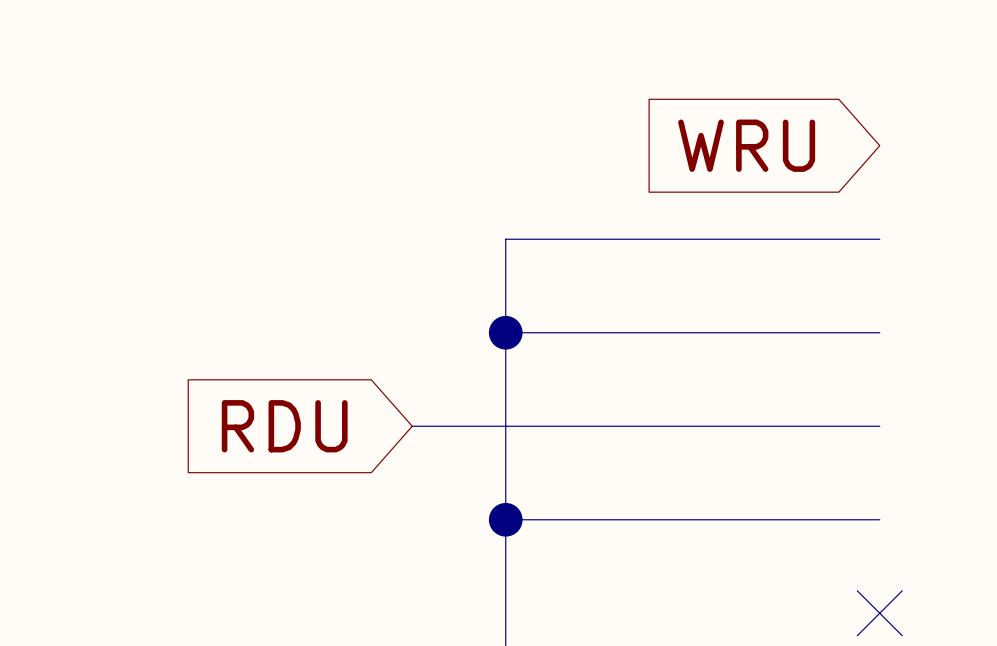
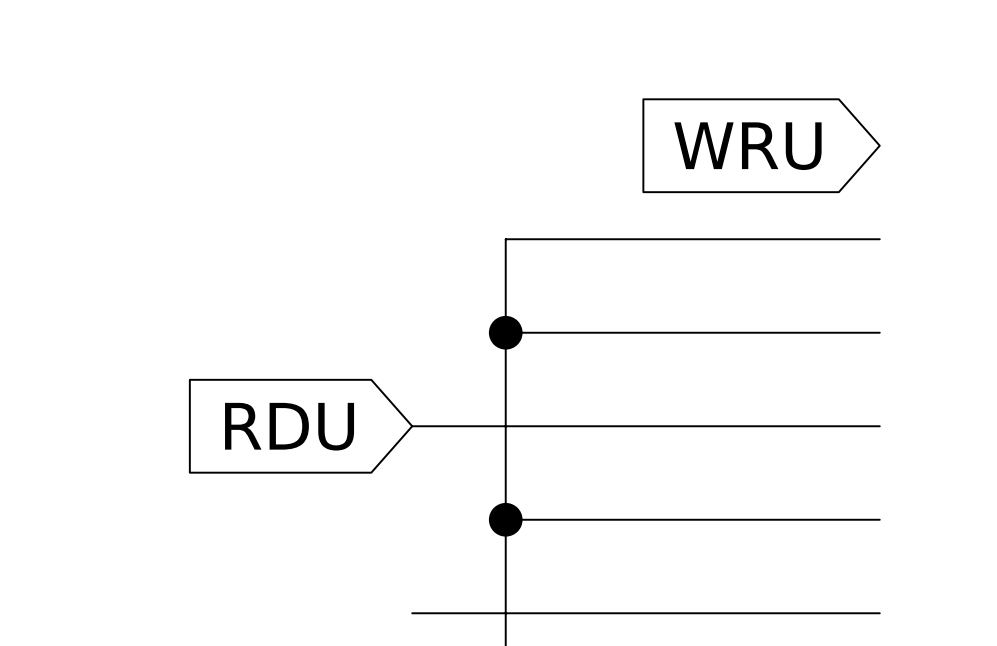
wire: none -> (412, 613) (879, 613)
no-connect mark: (879, 613) -> none

